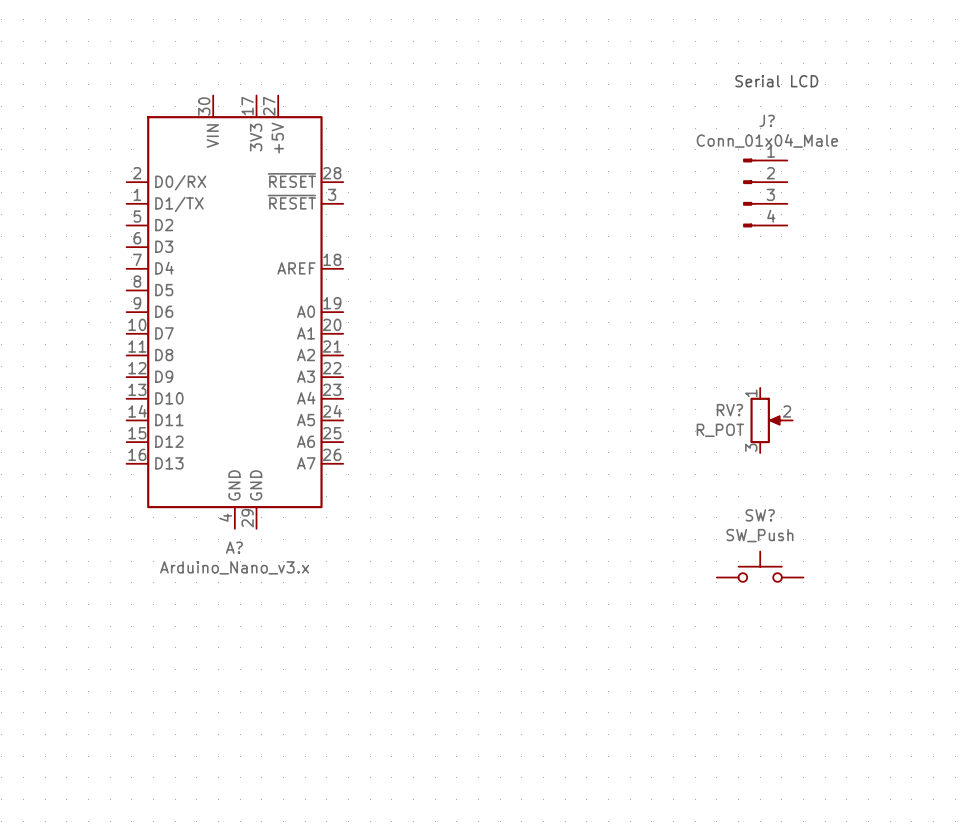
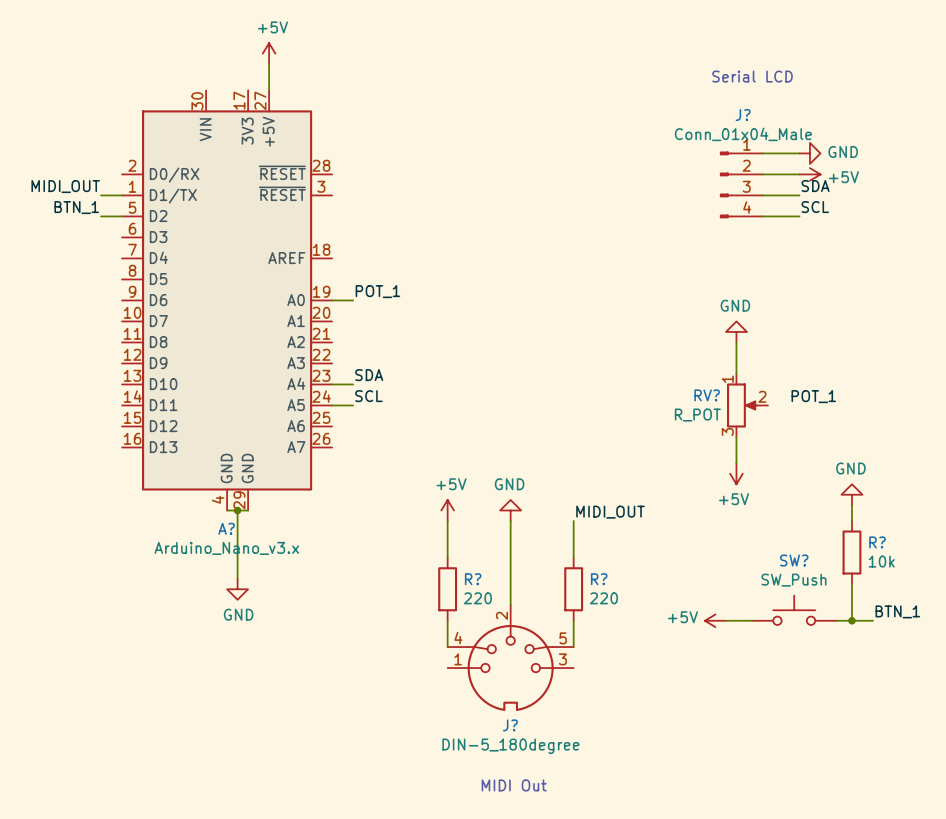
power symbol: none -> +5V (269, 53)
wire: none -> (269, 64) (269, 90)
wire: none -> (762, 153) (799, 153)
power symbol: none -> GND (809, 153)
wire: none -> (762, 174) (799, 174)
power symbol: none -> +5V (809, 174)
label: none -> MIDI_OUT (65, 186)
label: none -> SDA (815, 186)
wire: none -> (101, 195) (122, 195)
wire: none -> (762, 195) (799, 195)
label: none -> SCL (815, 207)
label: none -> BTN_1 (76, 207)
wire: none -> (101, 216) (122, 216)
wire: none -> (762, 216) (799, 216)
label: none -> POT_1 (377, 291)
wire: none -> (332, 300) (353, 300)
power symbol: none -> GND (736, 331)
wire: none -> (736, 342) (736, 373)
label: none -> SDA (369, 375)
wire: none -> (332, 384) (353, 384)
label: none -> SCL (368, 396)
label: none -> POT_1 (813, 396)
wire: none -> (332, 405) (353, 405)
wire: none -> (736, 436) (736, 463)
power symbol: none -> +5V (736, 473)
power symbol: none -> GND (851, 494)
wire: none -> (851, 505) (851, 521)
wire: none -> (227, 510) (248, 510)
wire: none -> (237, 510) (237, 578)
junction: none -> (237, 510)
power symbol: none -> +5V (447, 510)
power symbol: none -> GND (510, 510)
label: none -> MIDI_OUT (610, 512)
wire: none -> (447, 521) (447, 557)
wire: none -> (510, 521) (510, 605)
wire: none -> (573, 521) (573, 557)
SW? position: (760, 566) -> (794, 610)
R?: none -> 10k (851, 552)
wire: none -> (851, 584) (851, 620)
power symbol: none -> GND (237, 589)
R?: none -> 220 (447, 589)
R?: none -> 220 (573, 589)
label: none -> BTN_1 (897, 611)
wire: none -> (447, 620) (447, 647)
wire: none -> (573, 620) (573, 647)
power symbol: none -> +5V (715, 620)
wire: none -> (725, 620) (752, 620)
wire: none -> (836, 620) (872, 620)
junction: none -> (851, 620)
J?: none -> DIN-5_180degree (510, 658)
text: none -> MIDI Out (514, 785)

